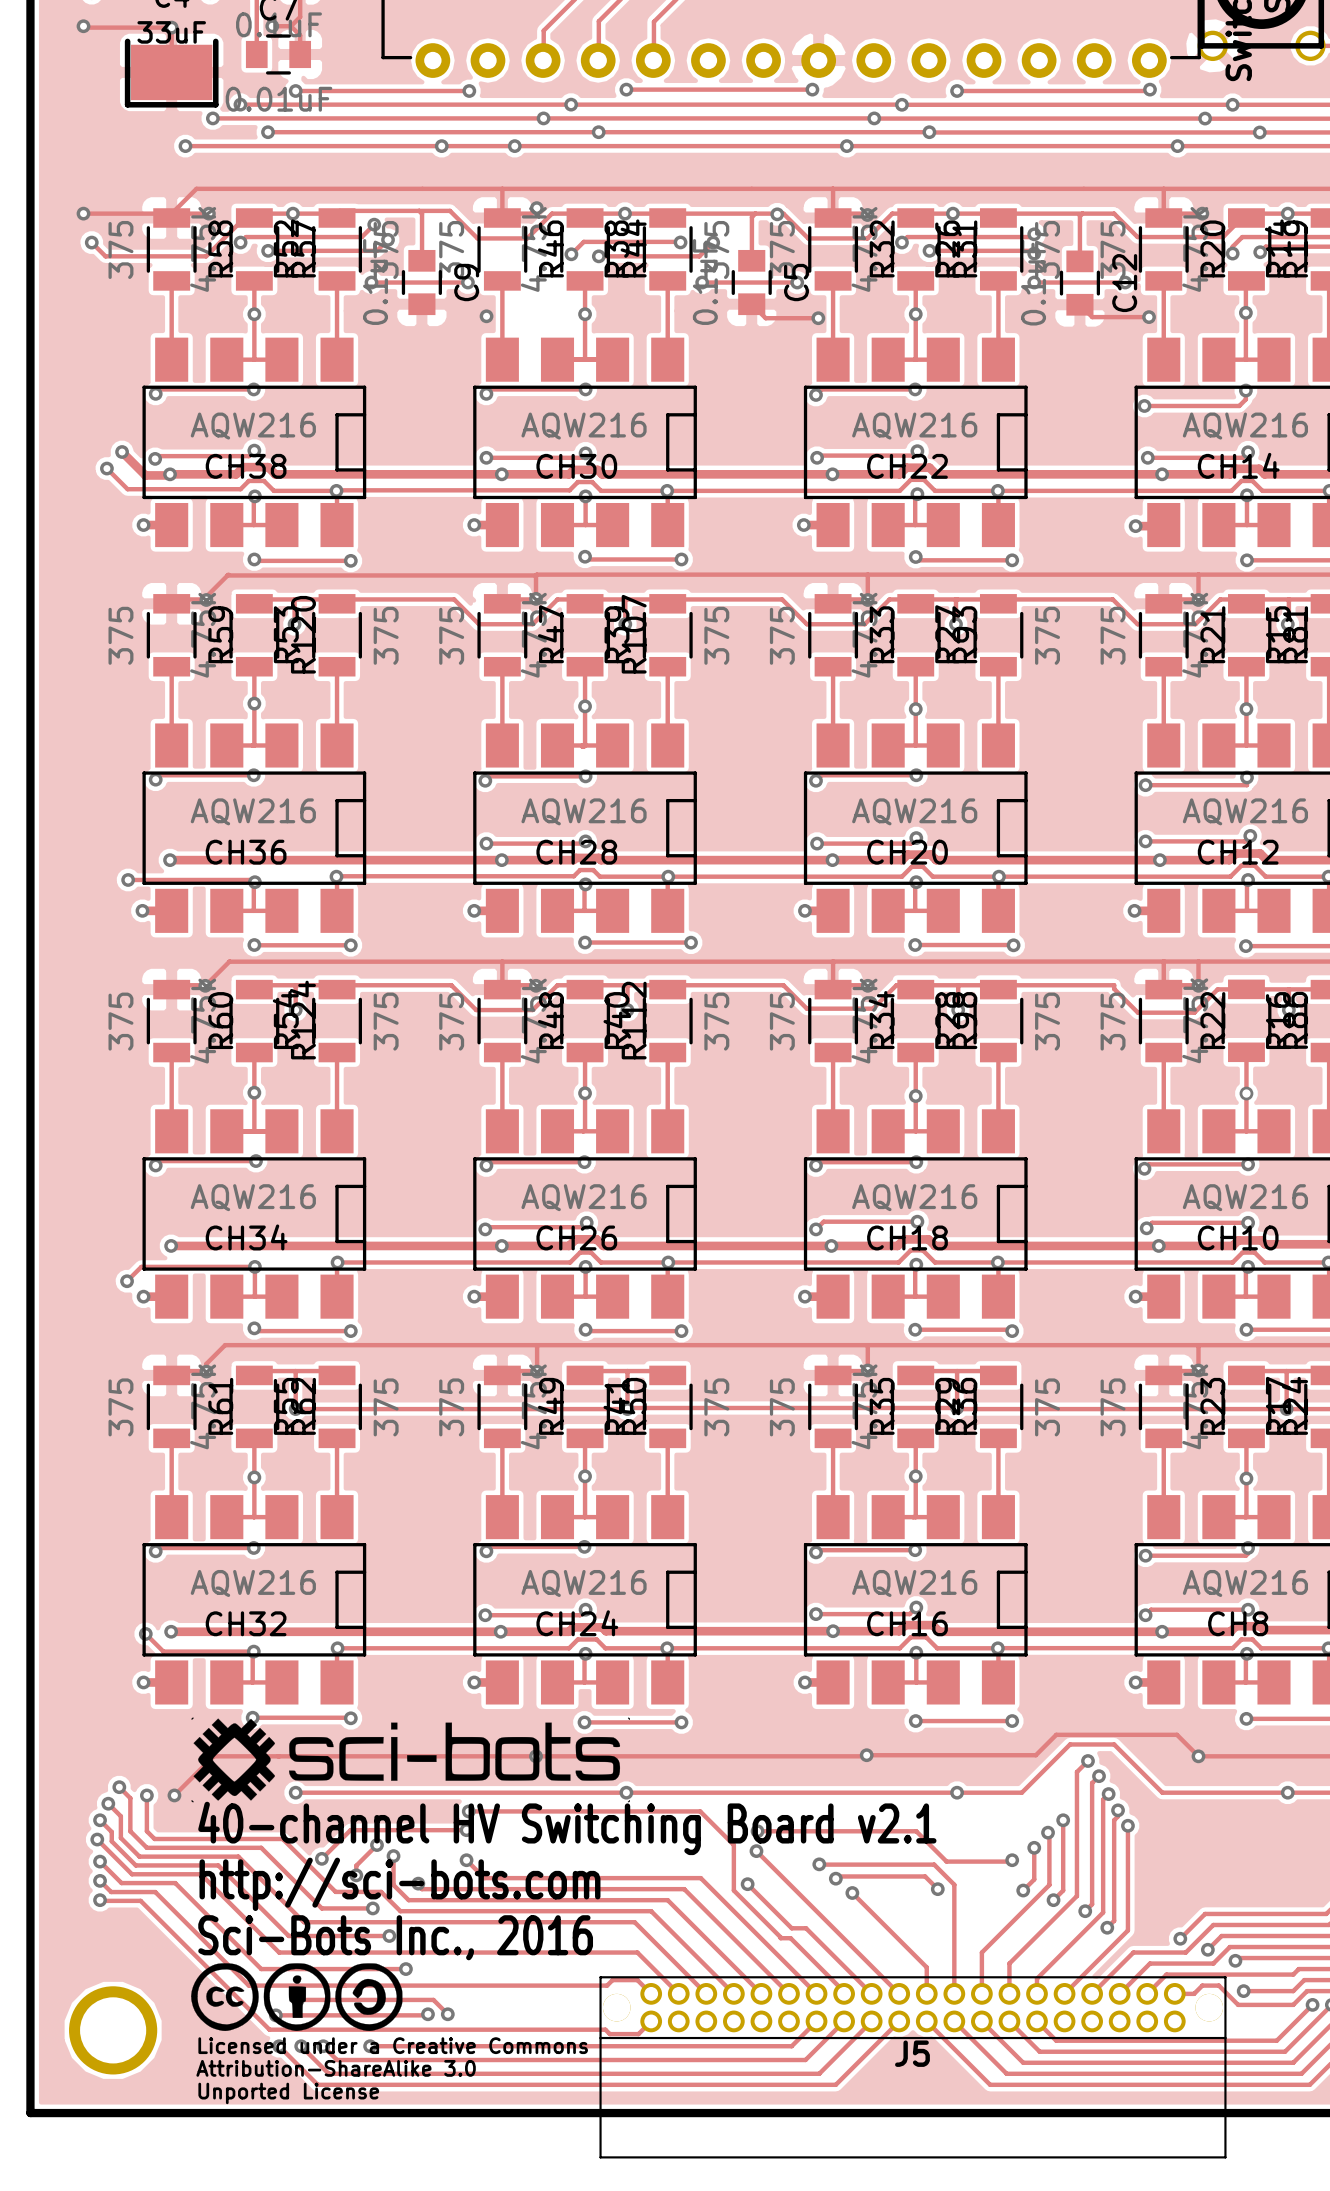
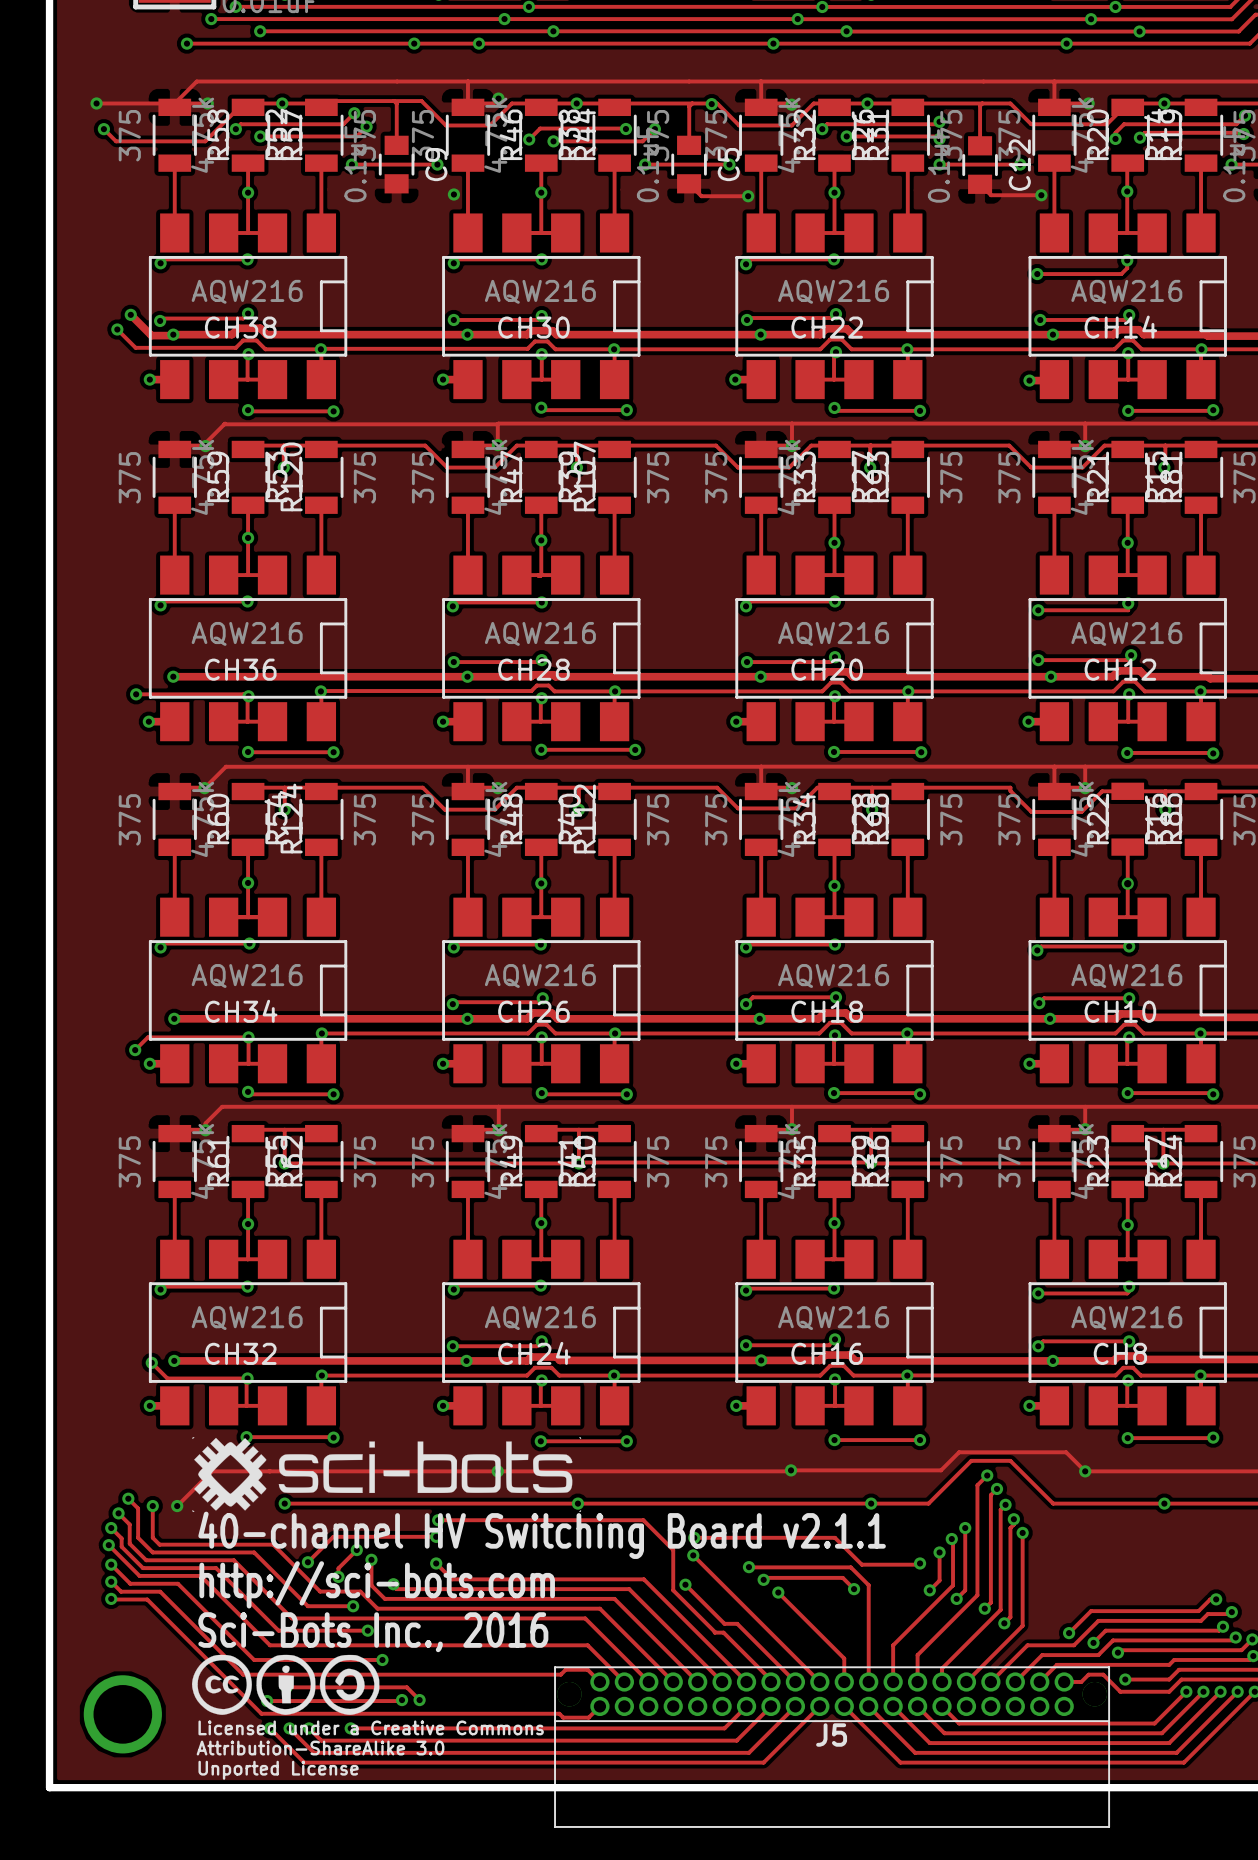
text: 40-channel HV Switching Board v2.1 (567, 1828) -> 40-channel HV Switching Board v2.1.1 (542, 1535)

